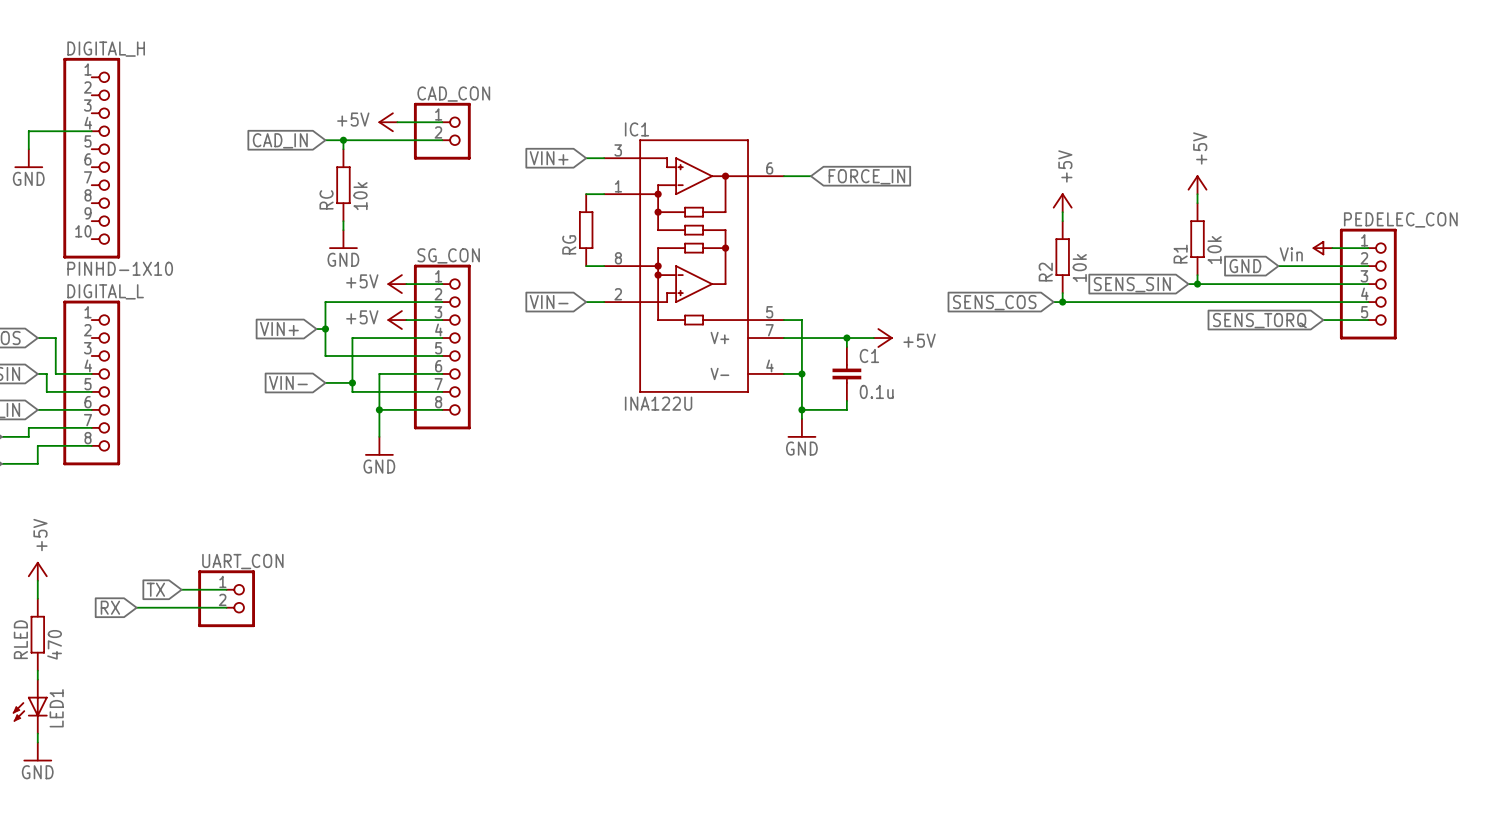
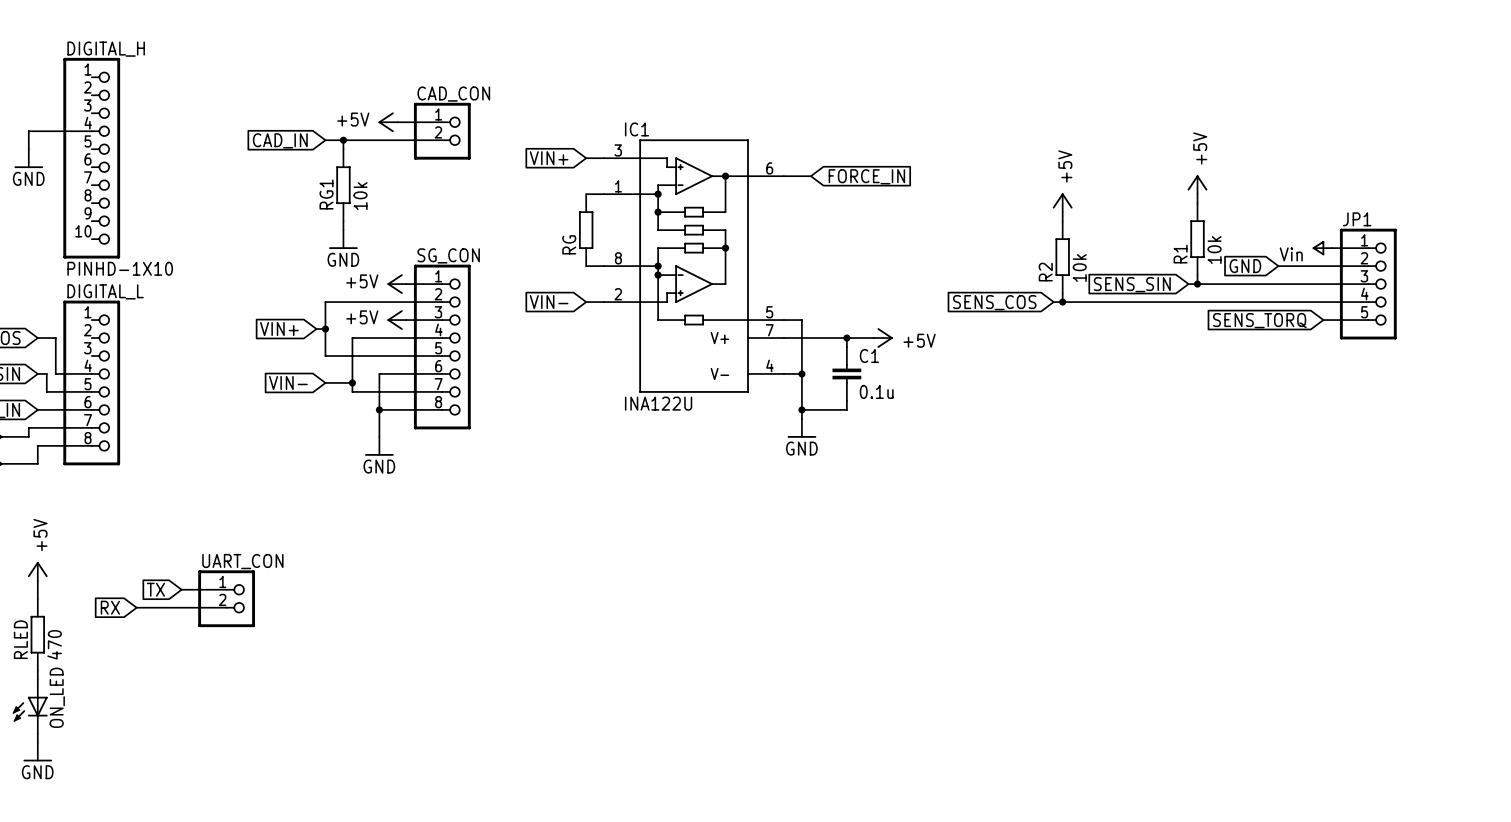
RC name: RC (326, 199) -> RG1 (326, 194)
PEDELEC_CON name: PEDELEC_CON (1400, 219) -> JP1 (1357, 219)
LED1 name: LED1 (56, 708) -> ON_LED (57, 697)

